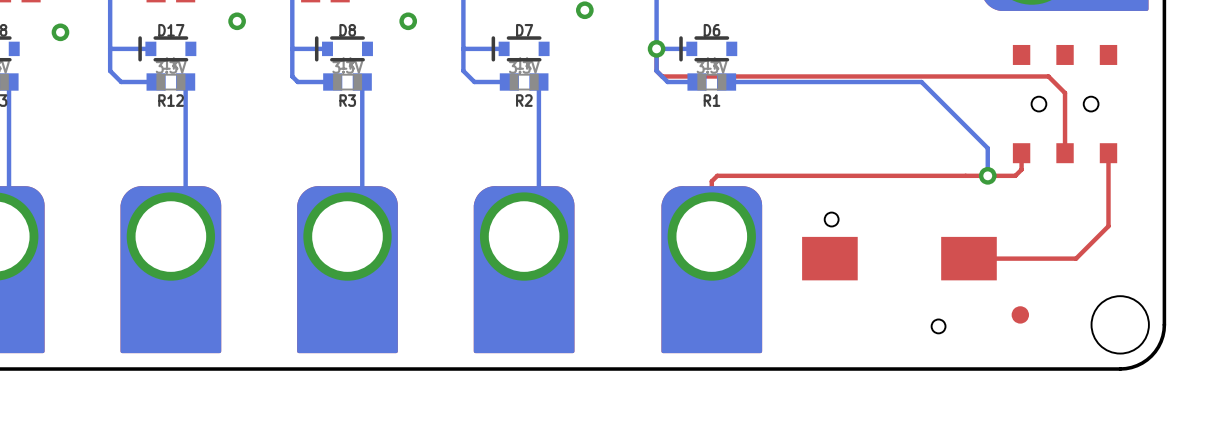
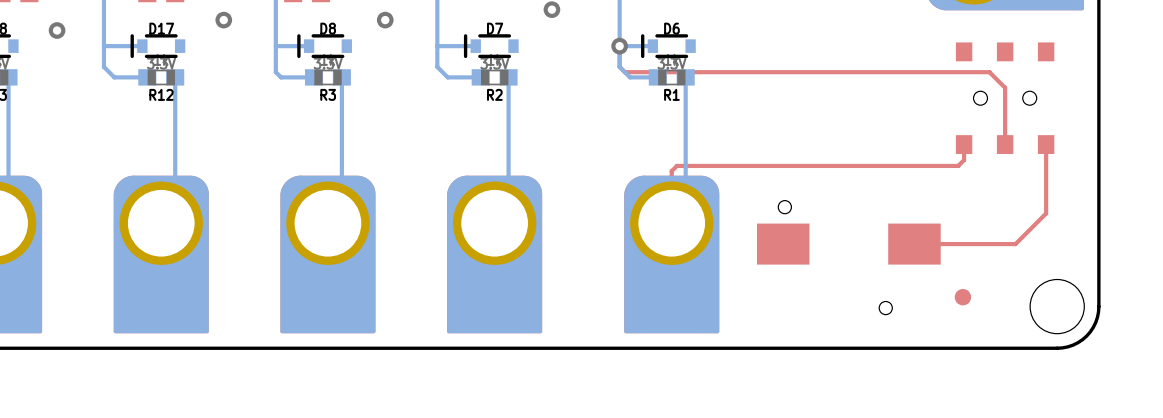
bottom track: (726, 82) (921, 82) (987, 148) (987, 175) -> (685, 77) (685, 209) (671, 223)
via: (987, 175) -> none

